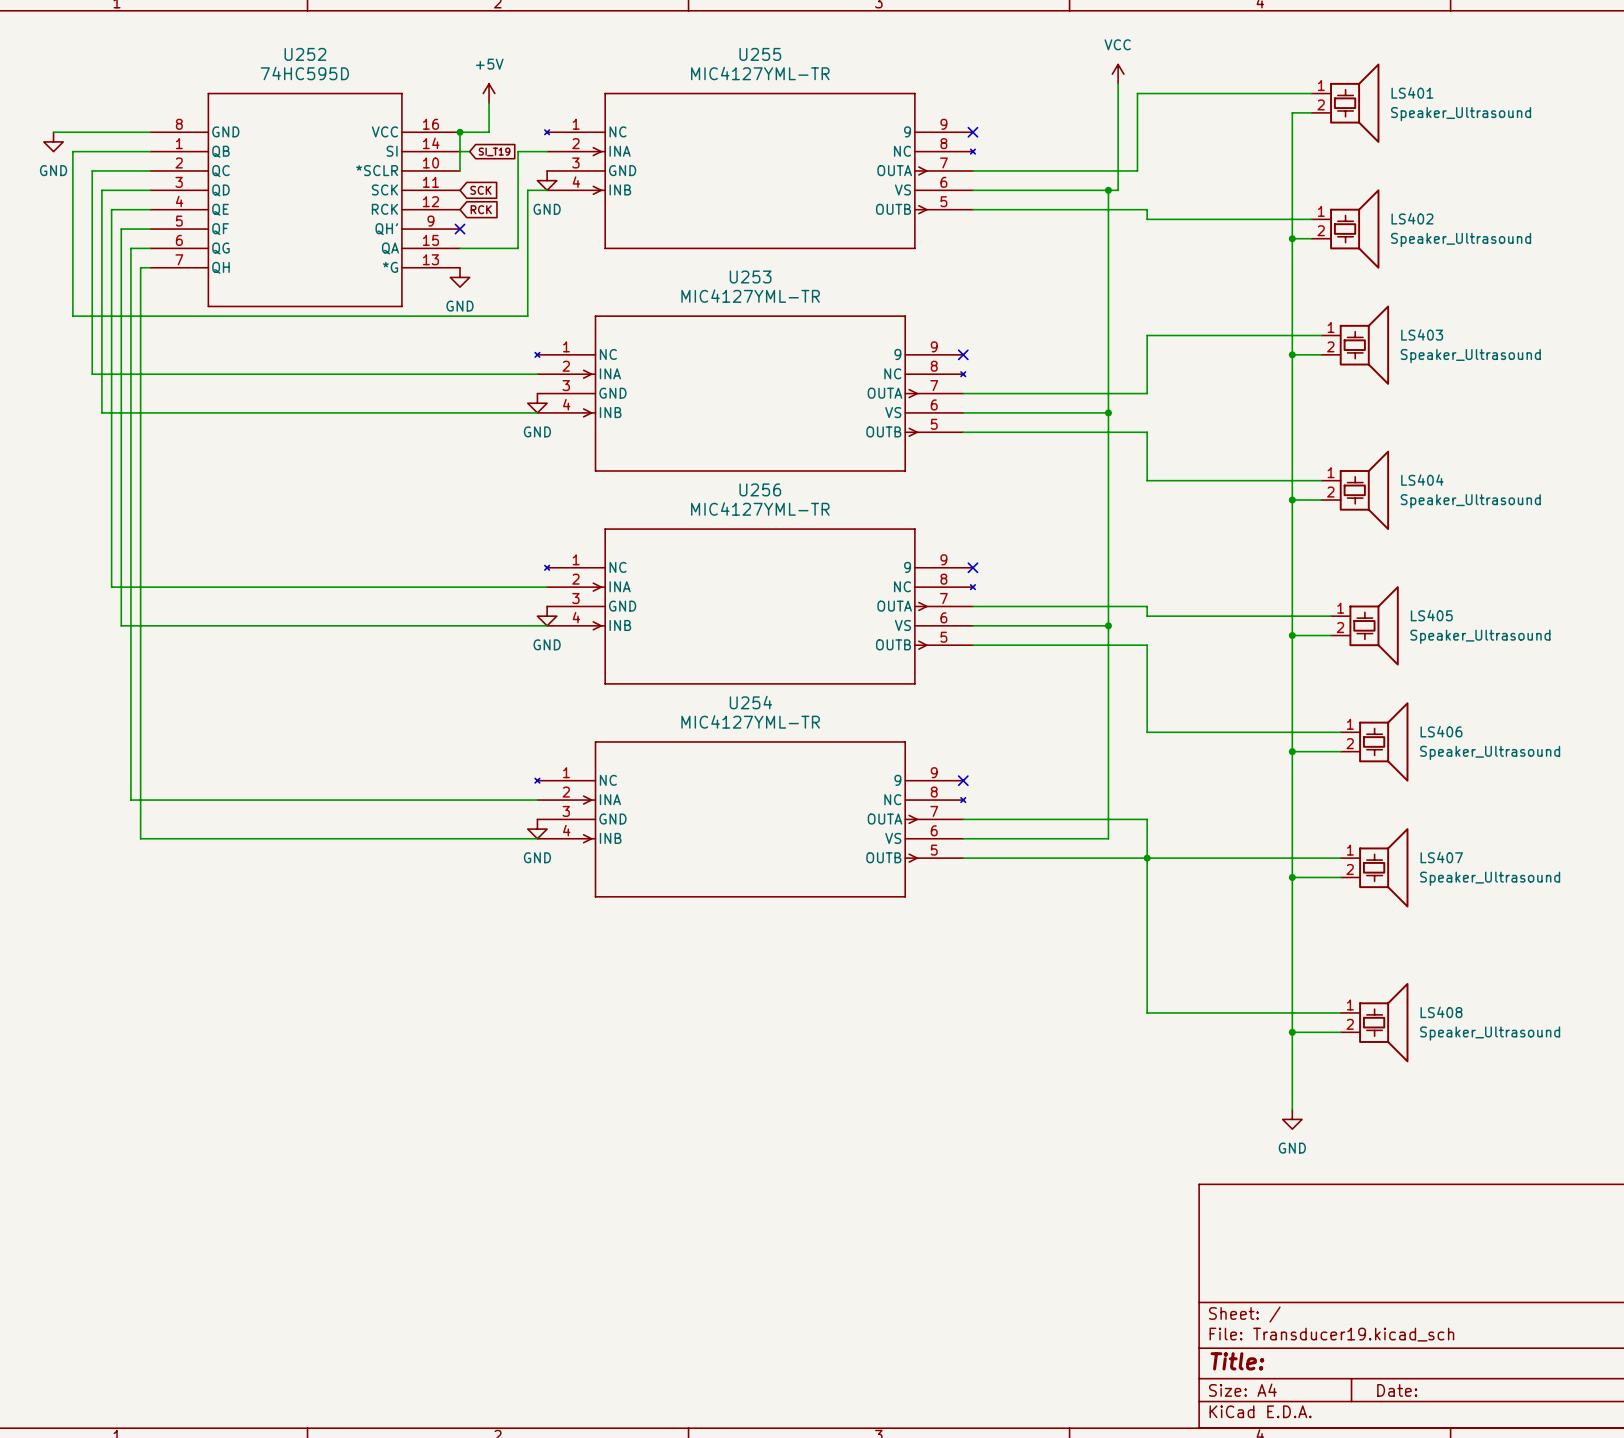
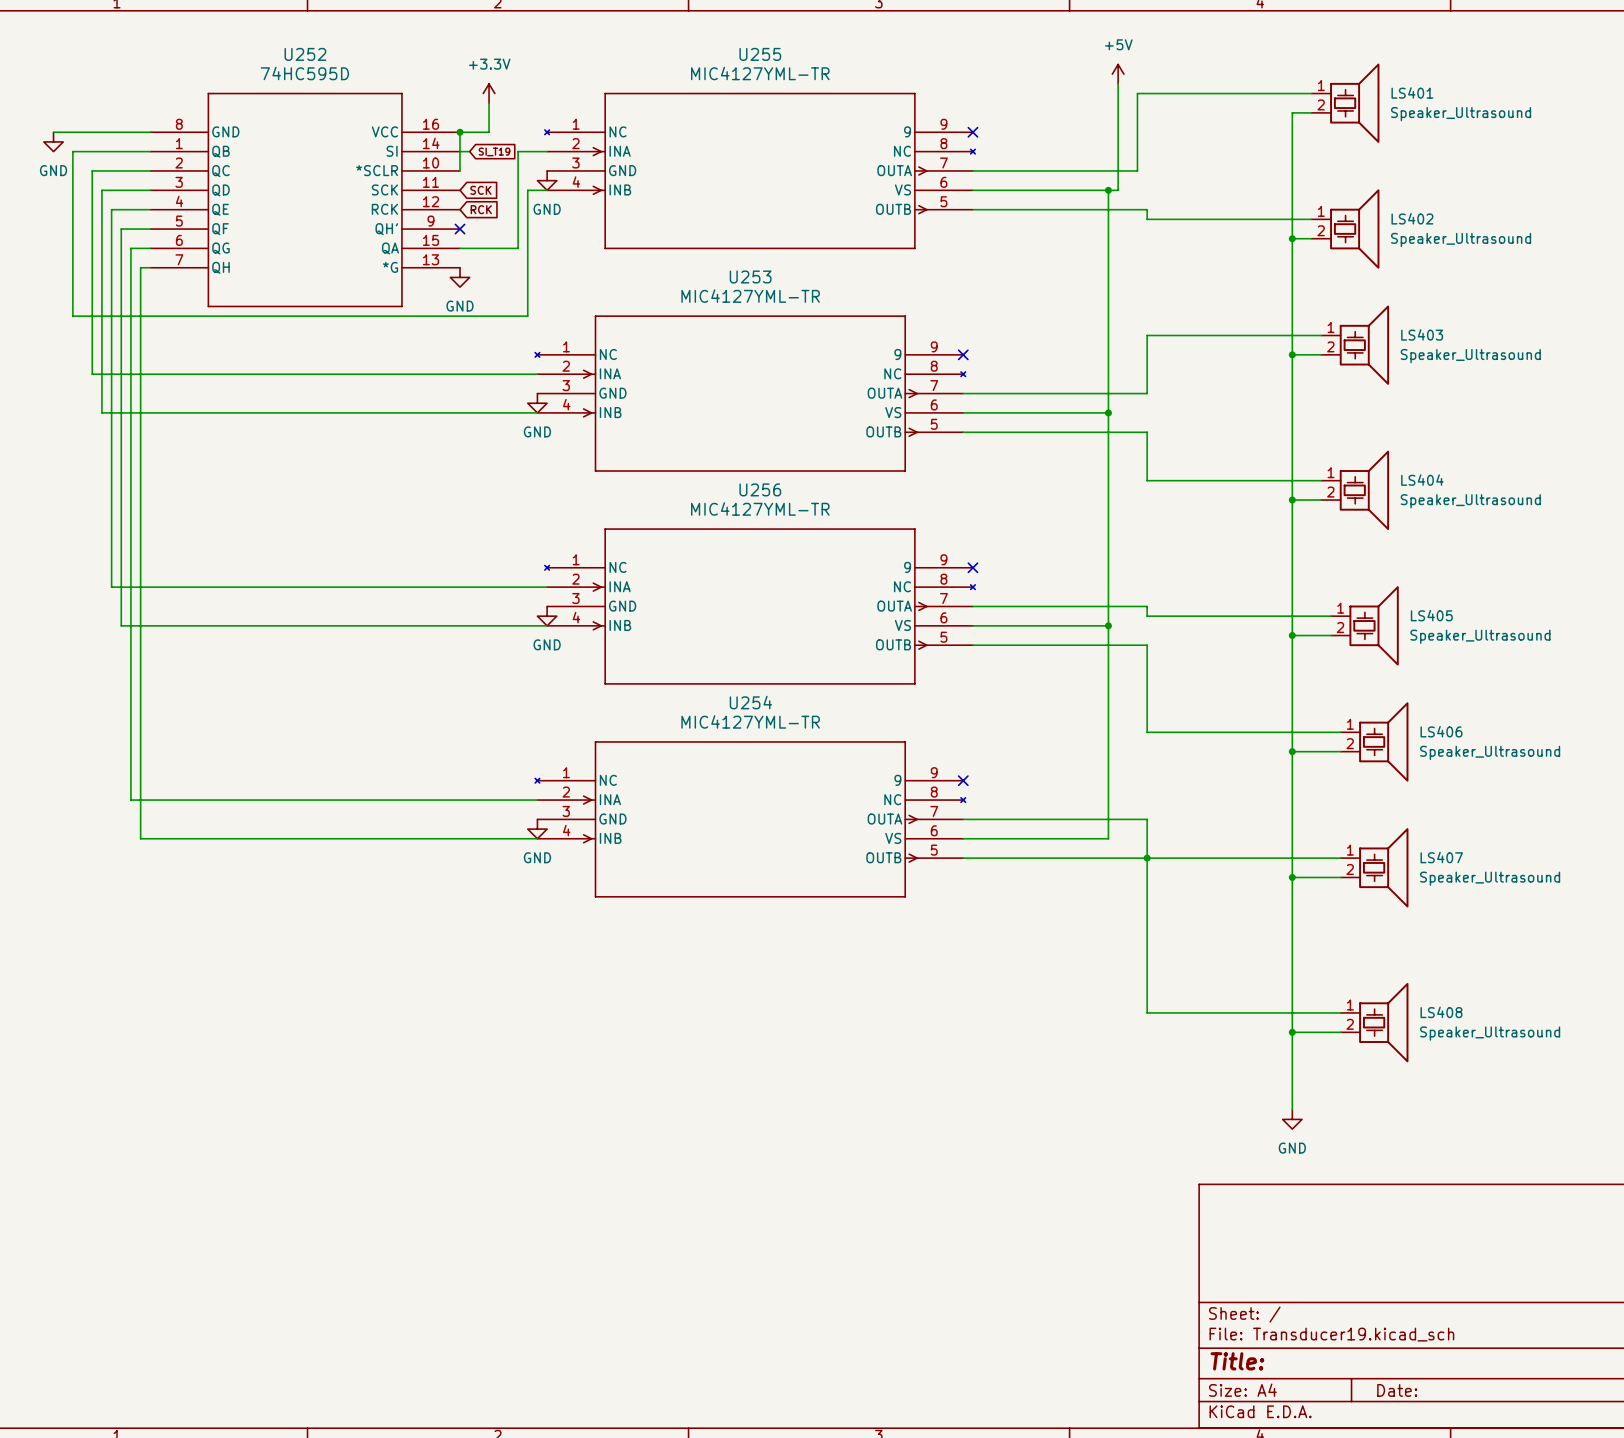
power symbol: VCC (1118, 74) -> +5V (1118, 74)
power symbol: +5V (489, 93) -> +3.3V (489, 93)

